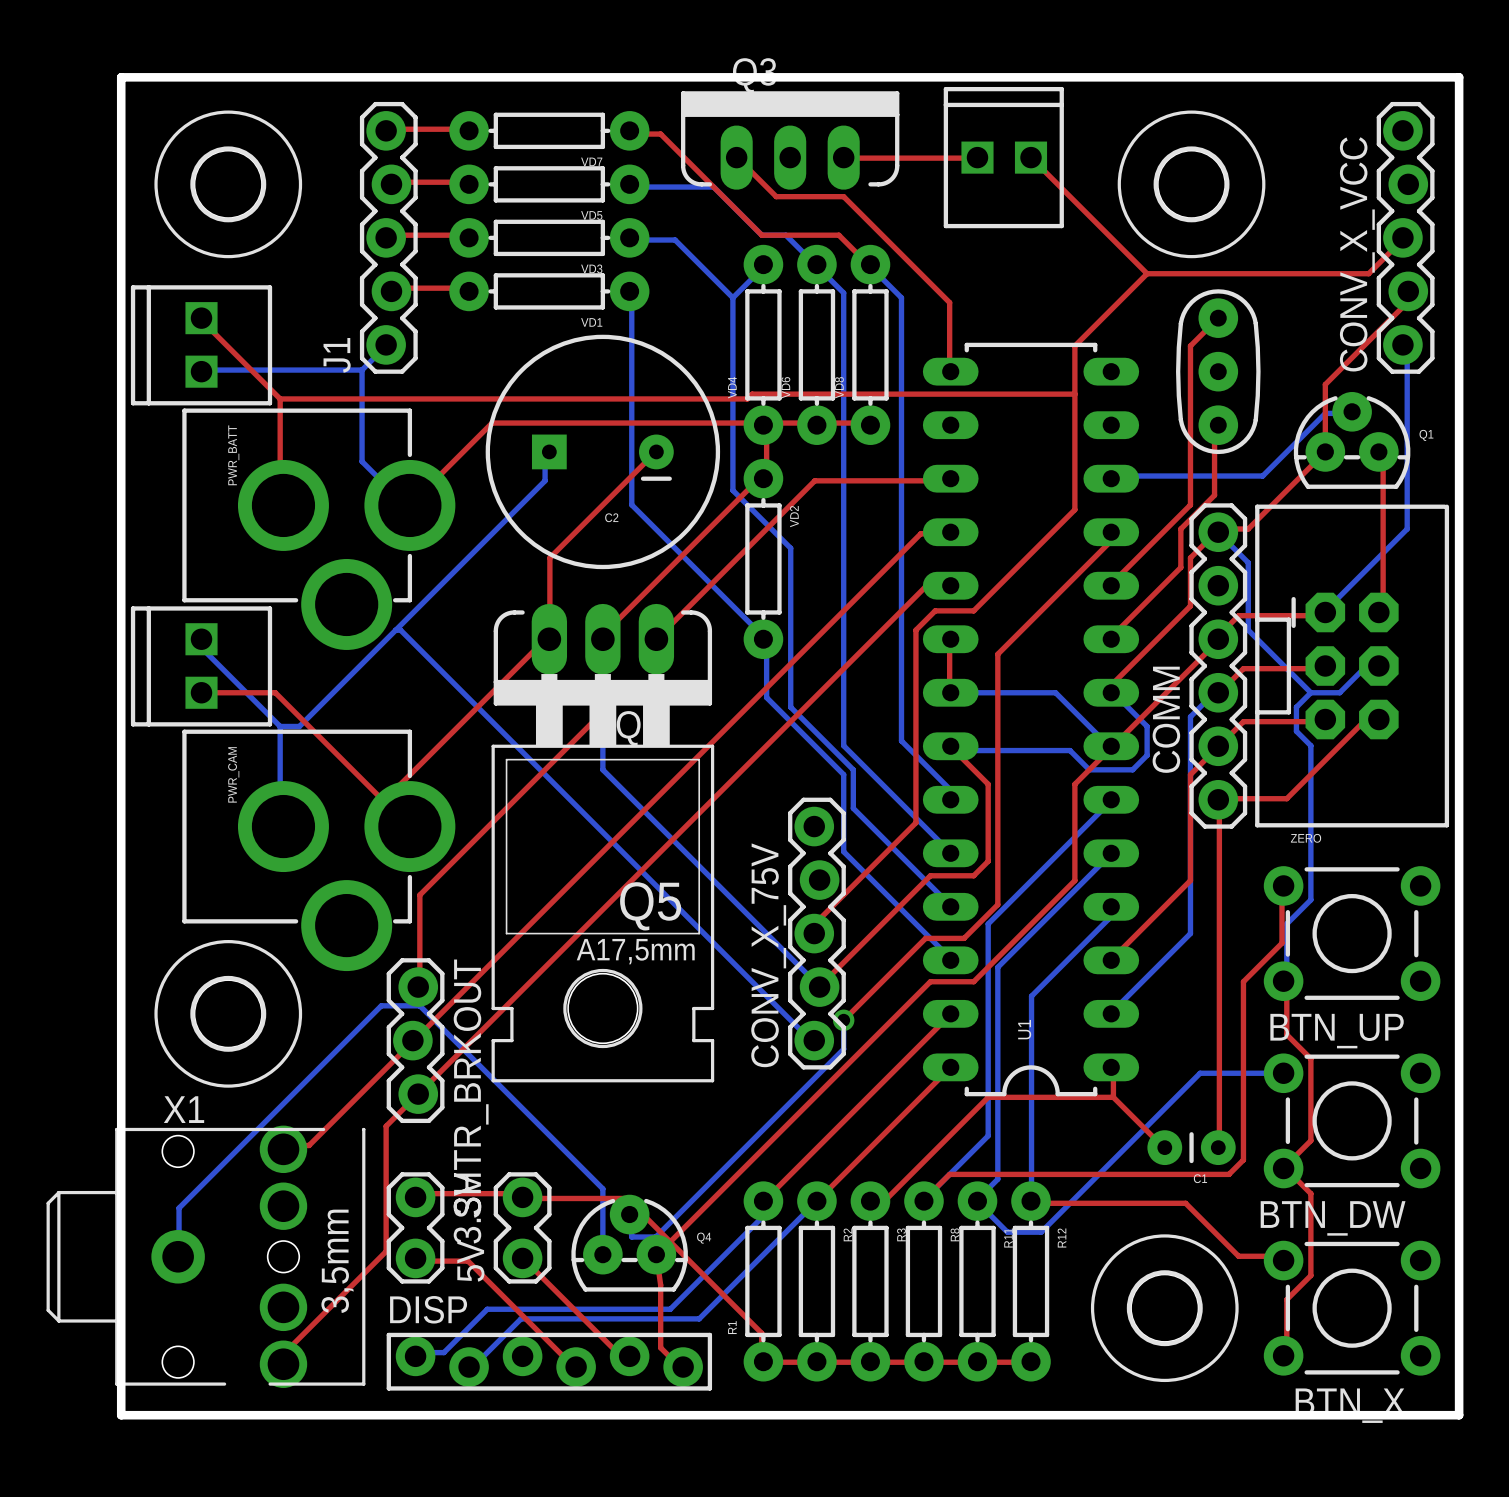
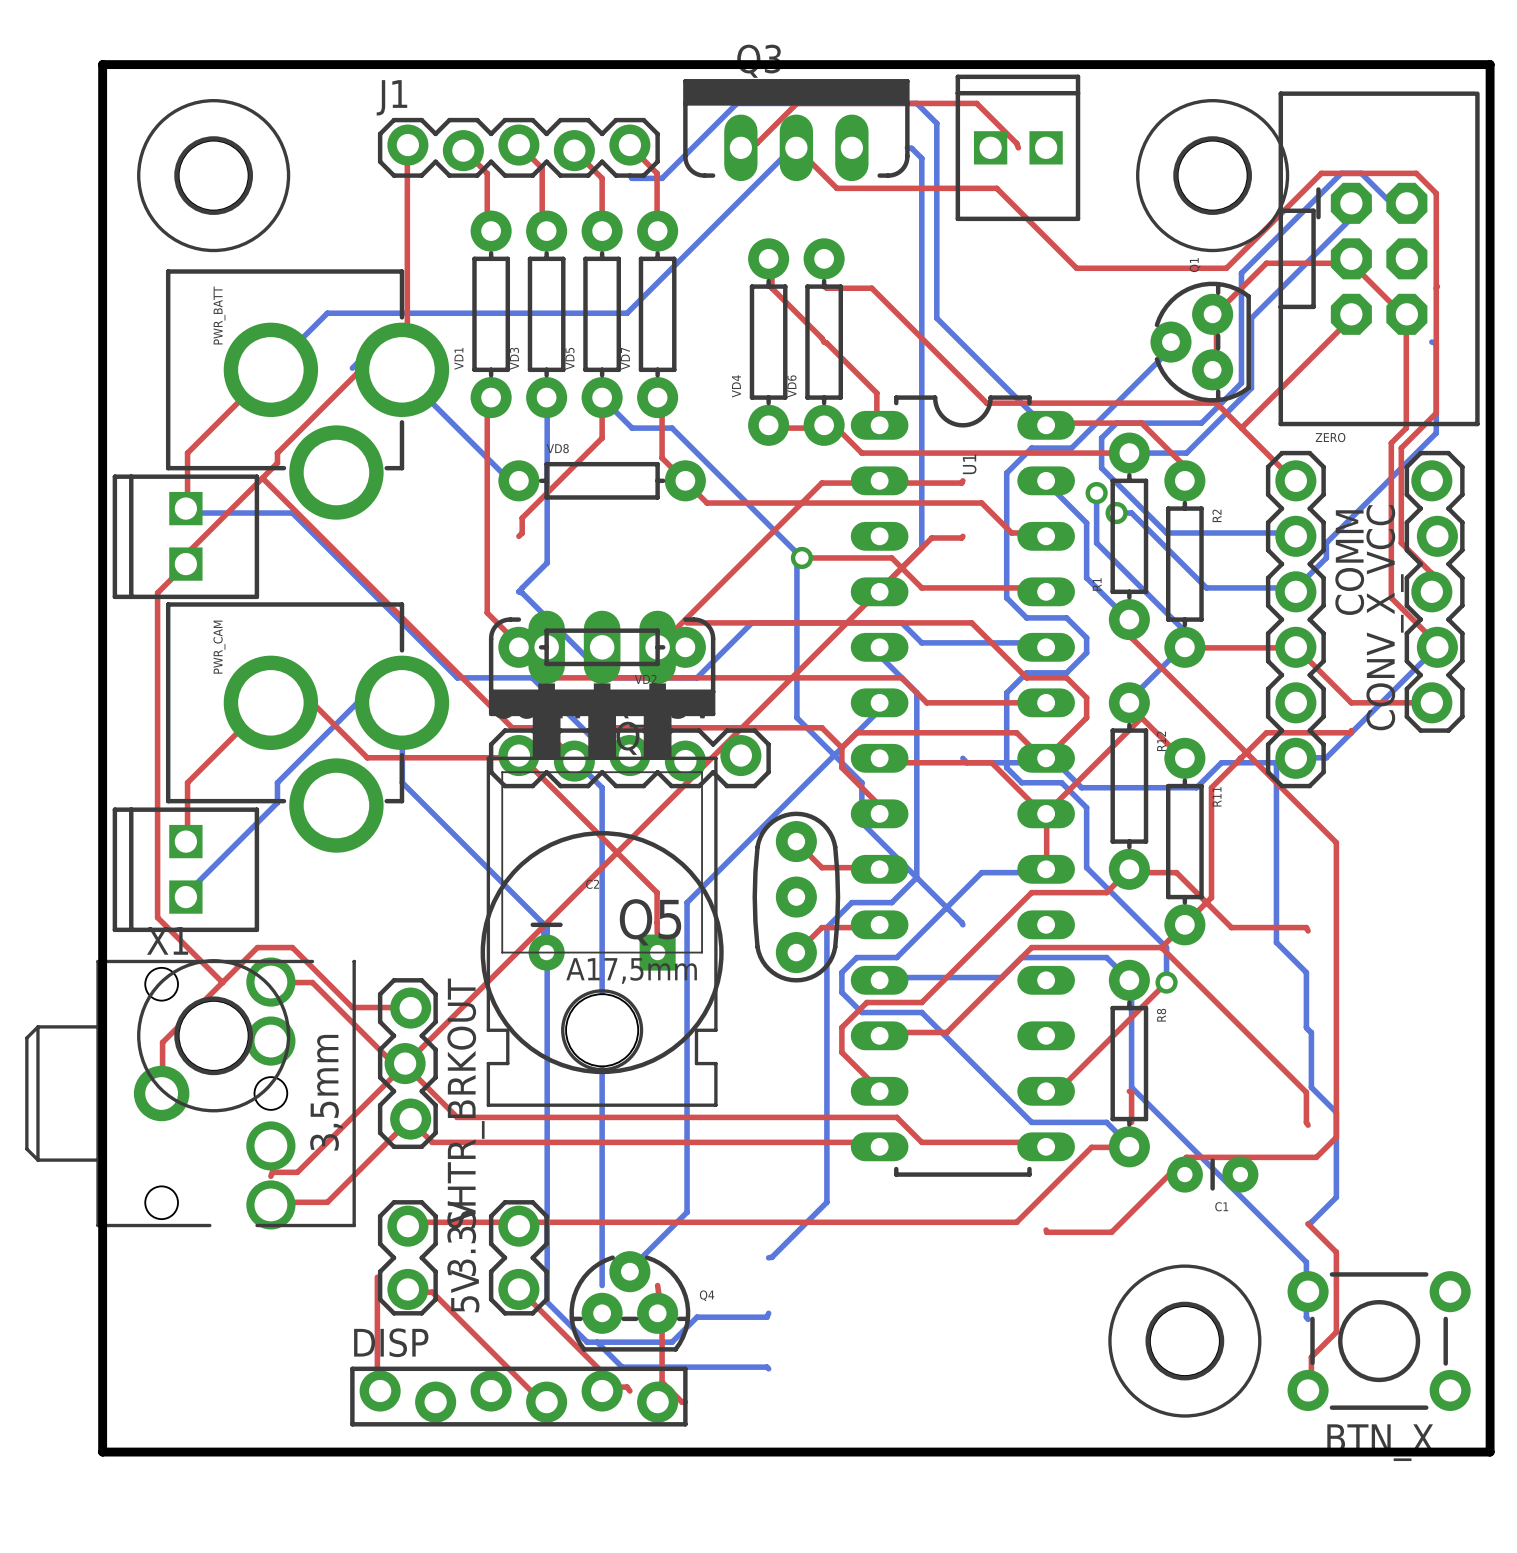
top track: (386, 130) (386, 129) (468, 129) (469, 130) -> none
VD7 rotation: 0° (549, 130) -> 90° clockwise (657, 314)
VD7 position: (549, 130) -> (657, 314)
top track: (629, 130) (631, 134) (660, 134) (761, 235) (838, 235) (870, 264) -> none
top track: none -> (407, 145) (407, 363) (397, 373) (357, 373) (277, 453) (277, 463) (187, 552) (187, 562) (157, 592) (157, 917) (222, 982)
top track: none -> (518, 145) (542, 168) (542, 228) (546, 231)
top track: none -> (629, 145) (657, 173) (657, 231)
top track: (736, 157) (776, 196) (829, 196) -> (796, 147) (836, 188)
top track: none -> (740, 147) (741, 143) (756, 143) (796, 103) (976, 103) (1016, 143) (1018, 147)
bottom track: none -> (796, 147) (791, 148) (627, 313) (327, 313) (270, 369)
top track: (843, 157) (977, 157) -> none
bottom track: none -> (907, 147) (911, 148) (921, 158) (921, 547) (879, 591)
top track: (1031, 157) (1147, 273) (1074, 345) (1074, 509) (973, 610) (935, 610) (915, 630) (915, 822) (814, 923) (814, 933) -> none
top track: none -> (463, 150) (487, 173) (487, 228) (491, 231)
top track: none -> (574, 150) (602, 178) (602, 231)
top track: (391, 184) (395, 182) (468, 182) (469, 184) -> none
VD5 rotation: 0° (549, 184) -> 90° clockwise (602, 314)
VD5 position: (549, 184) -> (602, 314)
bottom track: (660, 187) (713, 187) (761, 235) (785, 235) (843, 292) (843, 745) (950, 853) -> (662, 178) (736, 103) (916, 103) (936, 123) (936, 318) (1041, 423) (1046, 425)
top track: (843, 196) (949, 302) (950, 371) -> (851, 188) (996, 188) (1076, 268) (1166, 268)
bottom track: none -> (1351, 203) (1351, 218) (1251, 318) (1251, 388) (1186, 453) (1129, 453)
bottom track: none -> (1406, 203) (1391, 203) (1361, 173) (1341, 173) (1241, 273) (1241, 383) (1201, 423) (1116, 423) (1101, 438) (1101, 468) (1166, 533) (1291, 533) (1295, 536)
top track: (386, 237) (386, 235) (468, 235) (469, 237) -> none
J1 rotation: 0° (388, 237) -> 90° clockwise (518, 147)
VD3 rotation: 0° (549, 237) -> 90° clockwise (546, 314)
bottom track: (629, 237) (631, 240) (675, 240) (732, 297) -> none
top track: (1402, 237) (1368, 273) (1204, 273) -> (1436, 288) (1436, 193) (1416, 173) (1321, 173) (1226, 268)
CONV_X_VCC position: (1405, 237) -> (1434, 591)
bottom track: (763, 264) (761, 268) (732, 297) -> none
bottom track: (870, 264) (901, 297) (901, 740) (949, 789) (950, 799) -> none
top track: none -> (1351, 263) (1406, 318)
top track: none -> (1351, 263) (1266, 263) (1216, 313) (1212, 314) (1216, 318) (1216, 368) (1212, 369)
top track: (391, 291) (395, 288) (468, 288) (469, 291) -> none
VD1 rotation: 0° (549, 291) -> 90° clockwise (491, 314)
bottom track: (629, 291) (631, 292) (631, 504) (761, 634) (763, 639) (766, 639) (766, 697) (843, 774) (843, 851) (950, 960) -> none
top track: none -> (824, 286) (826, 288) (871, 288) (986, 403) (1216, 403) (1295, 480)
bottom track: (732, 297) (732, 490) -> (602, 397) (632, 428) (672, 428) (736, 493)
top track: (1407, 302) (1325, 384) (1325, 451) (1248, 529) (1219, 529) (1218, 532) (1190, 557) (1190, 606) (1113, 683) (1113, 692) (1111, 692) -> (1436, 298) (1436, 413) (1401, 448) (1401, 542) (1431, 572) (1431, 591)
top track: (201, 318) (280, 398) -> none
top track: (1218, 318) (1190, 345) (1190, 504) (1111, 585) -> none
top track: none -> (1351, 314) (1351, 318) (1241, 428)
top track: none -> (1406, 318) (1406, 428) (1391, 443) (1391, 597) (1436, 642) (1437, 647)
VD8 rotation: 0° (870, 344) -> 90° clockwise (602, 480)
VD8 position: (870, 344) -> (602, 480)
bottom track: none -> (1170, 342) (1166, 343) (1166, 353) (1071, 448) (1031, 448) (1006, 473) (1006, 597) (1026, 617) (1066, 617) (1086, 637) (1086, 652) (1066, 672) (1026, 672) (1006, 692) (1006, 767) (1021, 782) (1061, 782) (1086, 807) (1086, 867) (1166, 947) (1166, 982)
part: (201, 345) -> none
bottom track: (201, 371) (203, 370) (362, 370) (362, 461) (405, 504) (409, 505) -> none
top track: none -> (270, 369) (187, 453) (187, 508) (185, 508)
bottom track: none -> (401, 369) (402, 373) (507, 478) (517, 478) (518, 480)
part: (1218, 371) -> none
top track: (1074, 394) (752, 394) (747, 398) (280, 398) -> none
top track: (280, 398) (280, 504) (283, 505) -> none
bottom track: none -> (546, 397) (547, 562) (518, 591) (522, 592) (607, 677) (697, 677) (751, 622) (901, 622) (921, 642) (1041, 642) (1046, 647)
top track: none -> (602, 397) (602, 438) (522, 518) (522, 533) (518, 536)
top track: none -> (657, 397) (662, 398) (662, 458) (707, 503) (981, 503) (1011, 533) (1041, 533) (1046, 536)
bottom track: (1352, 411) (1325, 413) (1262, 476) (1113, 476) (1111, 478) -> none
top track: (867, 423) (819, 423) (816, 425) (814, 423) (766, 423) (763, 425) (761, 423) (492, 423) (409, 505) -> (876, 423) (876, 393) (771, 288) (771, 263) (768, 258)
top track: none -> (1046, 425) (1046, 423) (1141, 423) (1181, 463) (1181, 478) (1184, 480)
top track: (1218, 425) (1214, 427) (1214, 495) (1180, 529) (1180, 567) (1111, 639) -> none
top track: (766, 427) (766, 476) (763, 478) (761, 476) (602, 634) (602, 712) (419, 895) (419, 986) (418, 987) -> (161, 1093) (162, 1042) (257, 947) (292, 947) (352, 1007) (410, 1008)
top track: none -> (771, 428) (836, 428) (861, 453) (1129, 453)
bottom track: (1407, 432) (1407, 529) (1325, 612) -> (1436, 433) (1326, 542) (1326, 557) (1296, 587) (1295, 591) (1291, 587) (1206, 587) (1131, 513) (1116, 513)
Q1 rotation: 0° (1352, 440) -> 90° counterclockwise (1200, 342)
Q1 position: (1352, 440) -> (1200, 342)
bottom track: (549, 451) (545, 451) (545, 480) (299, 726) (280, 726) -> none
C2 rotation: 0° (602, 451) -> 180° (602, 952)
C2 position: (602, 451) -> (602, 952)
top track: (656, 451) (549, 557) (549, 639) (545, 639) (386, 798) (381, 798) (409, 826) (405, 822) (275, 692) (201, 692) -> none
top track: (1378, 451) (1383, 451) (1383, 610) (1378, 612) -> none
top track: none -> (262, 478) (512, 727) (542, 727) (574, 761) (577, 757) (587, 757) (617, 727) (821, 727) (841, 747)
bottom track: none -> (1046, 480) (1086, 523) (1086, 577) (1129, 619)
via: none -> (1096, 493)
bottom track: none -> (185, 508) (187, 513) (292, 513) (457, 677) (532, 677) (607, 752) (627, 752) (629, 755)
via: none -> (1116, 513)
PWR_BATT position: (318, 529) -> (307, 394)
part: none -> (185, 536)
top track: (1111, 532) (1108, 533) (1108, 543) (997, 654) (997, 904) (964, 938) (925, 938) (843, 1020) -> none
bottom track: (1218, 532) (1248, 562) (1248, 630) (1310, 692) -> none
top track: none -> (801, 557) (891, 557) (921, 587) (1041, 587) (1046, 591)
via: none -> (801, 557)
VD2 rotation: 0° (763, 558) -> 90° clockwise (602, 647)
VD2 position: (763, 558) -> (602, 647)
top track: (950, 585) (925, 586) (418, 1094) -> (879, 1146) (876, 1142) (432, 1142) (410, 1119)
top track: (1325, 612) (1325, 615) (1238, 615) (1219, 634) (1219, 639) (1074, 784) (1074, 880) (973, 981) (930, 981) (670, 1241) -> none
top track: none -> (687, 622) (971, 622) (1026, 677) (1066, 677) (1086, 697) (1086, 717) (1046, 758) (1041, 757) (1016, 732) (856, 732) (841, 747)
bottom track: (395, 630) (400, 630) (809, 1039) (814, 1040) -> none
bottom track: (201, 639) (203, 639) (203, 649) (280, 726) -> none
bottom track: (602, 639) (602, 769) (819, 986) -> (879, 647) (881, 647) (881, 657) (916, 692) (916, 877) (891, 902) (851, 902) (826, 927) (826, 1007)
top track: (950, 639) (949, 692) -> (491, 397) (487, 398) (487, 612) (517, 642) (518, 647) (522, 647) (552, 677) (901, 677) (926, 702) (961, 702)
top track: none -> (1184, 647) (1295, 647) (1351, 702) (1431, 702)
bottom track: none -> (1437, 647) (1326, 757) (1296, 757) (1291, 762) (1221, 762) (1196, 787) (1081, 787) (1056, 762)
part: (201, 666) -> none
COMM position: (1218, 666) -> (1295, 619)
top track: (1325, 666) (1325, 668) (1243, 668) (1218, 692) -> none
ZERO position: (1352, 666) -> (1379, 258)
bottom track: (1378, 666) (1378, 668) (1363, 668) (1339, 692) (1310, 692) -> none
bottom track: none -> (879, 702) (876, 702) (876, 712) (687, 902) (687, 1212) (629, 1271)
top track: none -> (962, 702) (1046, 702)
bottom track: (950, 692) (1055, 692) (1111, 746) -> none
bottom track: (1111, 692) (1147, 726) (1147, 755) (1132, 769) (1089, 769) (1070, 750) (1041, 750) -> (1129, 702) (1126, 702) (1181, 647) (1184, 647) (1181, 642) (1181, 627) (1096, 542) (1096, 493)
bottom track: (1218, 692) (1214, 692) (1190, 716) (1190, 933) (1111, 1013) -> none
bottom track: (1310, 692) (1296, 707) (1296, 731) (1310, 745) (1310, 899) (1286, 923) (1286, 976) (1283, 981) -> none
U1 rotation: 0° (1031, 719) -> 180° (962, 786)
COMM name position: COMM (1166, 719) -> COMM (1349, 562)
top track: (1378, 719) (1378, 721) (1363, 721) (1286, 798) (1218, 799) (1218, 1147) -> none
bottom track: (280, 726) (280, 822) (283, 826) -> none
top track: none -> (841, 747) (841, 767) (876, 802) (876, 812) (879, 813)
top track: none -> (879, 758) (881, 762) (991, 762) (1041, 812) (1046, 813)
top track: (950, 746) (988, 784) (988, 861) (973, 875) (930, 875) (819, 987) -> none
top track: none -> (1184, 758) (1181, 757) (1126, 702) (1129, 702) (1141, 717) (1046, 813)
bottom track: none -> (1295, 758) (1276, 762) (1276, 942) (1306, 972) (1306, 1027) (1311, 1032) (1311, 1087) (1336, 1112) (1336, 1197) (1308, 1223)
top track: none -> (1046, 813) (1046, 869)
bottom track: (1111, 799) (988, 923) (988, 1135) (923, 1201) -> none
top track: none -> (185, 841) (187, 837) (187, 782) (267, 702) (312, 702) (367, 757) (517, 757) (518, 755) (522, 757) (657, 892) (657, 952)
top track: none -> (796, 841) (821, 867) (876, 867) (879, 869)
PWR_CAM position: (318, 850) -> (307, 727)
part: none -> (185, 869)
bottom track: none -> (1046, 869) (1041, 872) (981, 872) (896, 957) (856, 957) (841, 972) (841, 992) (861, 1012) (921, 1012) (1031, 1122) (1106, 1122) (1129, 1146)
bottom track: (1111, 853) (997, 967) (997, 1179) (978, 1198) (978, 1203) (1007, 1232) (1041, 1232) (1200, 1073) (1283, 1073) -> none
part: none -> (796, 897)
top track: (1283, 885) (1281, 943) (1243, 981) (1243, 1159) (1229, 1174) (949, 1174) (923, 1201) -> none
top track: none -> (879, 924) (876, 927) (821, 927) (796, 952)
bottom track: (1111, 906) (1108, 909) (1108, 919) (1031, 996) (1031, 1201) -> none
top track: none -> (1308, 930) (1306, 927) (1231, 927) (1176, 872) (1131, 872) (1129, 869) (1106, 892) (1031, 892) (921, 1002) (866, 1002) (841, 1027) (841, 1052) (879, 1091)
top track: (1142, 928) (1111, 960) -> none
CONV_X_75V rotation: 0° (816, 933) -> 90° clockwise (629, 758)
CONV_X_75V position: (816, 933) -> (629, 758)
BTN_UP: (1352, 933) -> none
bottom track: none -> (879, 980) (881, 977) (1001, 977) (1021, 957) (1106, 957) (1131, 982) (1131, 1087) (1306, 1262) (1306, 1317) (1308, 1319)
top track: none -> (270, 982) (312, 982) (392, 1062) (405, 1063) (457, 1117) (896, 1117) (921, 1142) (1041, 1142) (1046, 1146)
top track: none -> (1166, 982) (1061, 1087) (1046, 1087) (1046, 1091)
via: none -> (1166, 982)
top track: (1283, 981) (1286, 981) (1286, 1034) (1310, 1058) -> (1129, 619) (1131, 622) (1131, 637) (1336, 842) (1336, 1082)
bottom track: none -> (826, 1008) (826, 1202) (771, 1257) (768, 1257)
bottom track: (419, 1005) (602, 1188) -> (574, 761) (602, 787) (602, 1217)
bottom track: (419, 1005) (381, 1005) (179, 1208) (178, 1256) -> none
top track: none -> (879, 1035) (881, 1032) (946, 1032) (1031, 947) (1161, 947) (1306, 1092) (1306, 1122) (1308, 1125)
top track: (950, 1013) (763, 1201) -> none
bottom track: (843, 1020) (843, 1049) (655, 1237) (631, 1237) (629, 1214) -> none
via: (843, 1020) -> none
top track: (950, 1067) (816, 1201) -> none
top track: (1310, 1111) (1310, 1140) (1283, 1168) (1310, 1193) (1310, 1222) -> (1308, 1223) (1336, 1252)
BTN_DW: (1352, 1120) -> none
top track: (386, 1126) (386, 1246) -> (377, 1152) (327, 1202) (272, 1202) (270, 1204)
top track: (1164, 1147) (1113, 1097) (988, 1097) (887, 1198) (872, 1198) (870, 1201) -> none
top track: (522, 1197) (626, 1198) (761, 1333) (763, 1361) (1031, 1361) -> (518, 1226) (522, 1222) (1016, 1222) (1091, 1147) (1129, 1146)
bottom track: (763, 1201) (761, 1217) (694, 1285) -> (768, 1313) (766, 1317) (697, 1317)
bottom track: (816, 1201) (699, 1318) (521, 1318) (472, 1367) (469, 1367) -> none
top track: (1094, 1203) (1185, 1203) (1238, 1256) (1281, 1256) (1283, 1260) -> (1111, 1232) (1186, 1157) (1316, 1157) (1336, 1137)
Q4 position: (629, 1243) -> (629, 1301)
top track: (386, 1251) (284, 1352) (283, 1364) -> (377, 1282) (377, 1387) (380, 1391)
X1 position: (205, 1256) -> (190, 1093)
top track: (439, 1261) (468, 1261) (576, 1367) -> (432, 1292) (542, 1402) (546, 1402)
top track: (1310, 1275) (1286, 1299) (1286, 1323) -> (1336, 1307) (1336, 1332) (1311, 1357)
R1 position: (763, 1281) -> (1129, 536)
R2 position: (816, 1281) -> (1184, 564)
R3: (870, 1281) -> none
R8 position: (923, 1281) -> (1129, 1063)
R11 position: (977, 1281) -> (1184, 841)
R12 position: (1031, 1281) -> (1129, 786)
bottom track: (588, 1309) (487, 1309) (443, 1352) (419, 1352) (415, 1356) -> (587, 1342) (547, 1302) (547, 927) (546, 952) (542, 922) (402, 782) (402, 702) (357, 702) (277, 782) (277, 802) (187, 892) (185, 897)
bottom track: none -> (597, 1342) (622, 1367) (766, 1367) (768, 1368)
DISP position: (549, 1361) -> (518, 1396)

